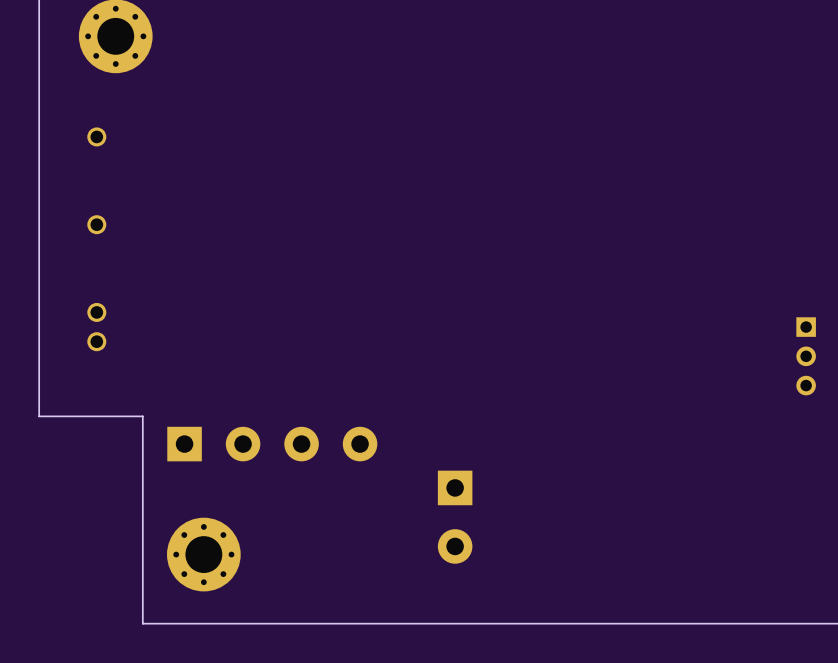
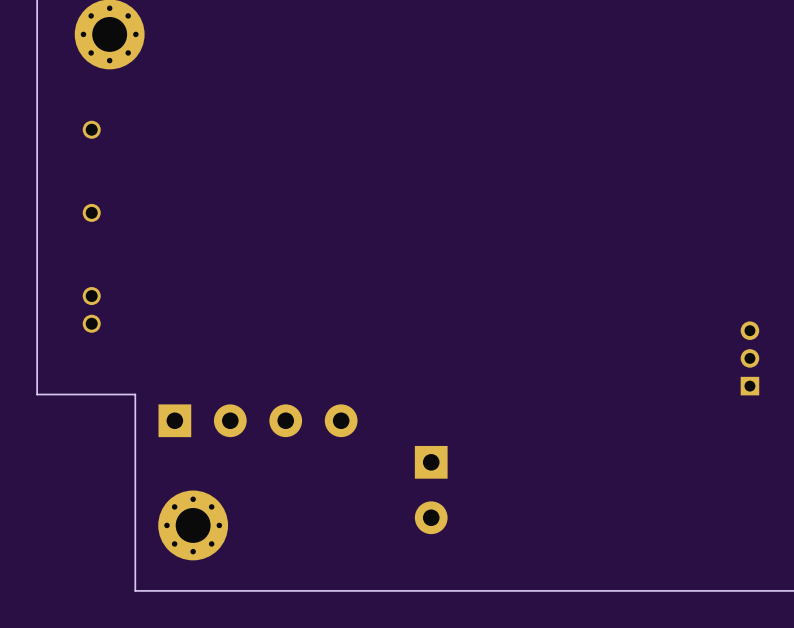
part rotation: 0° (806, 356) -> 180° (749, 358)

